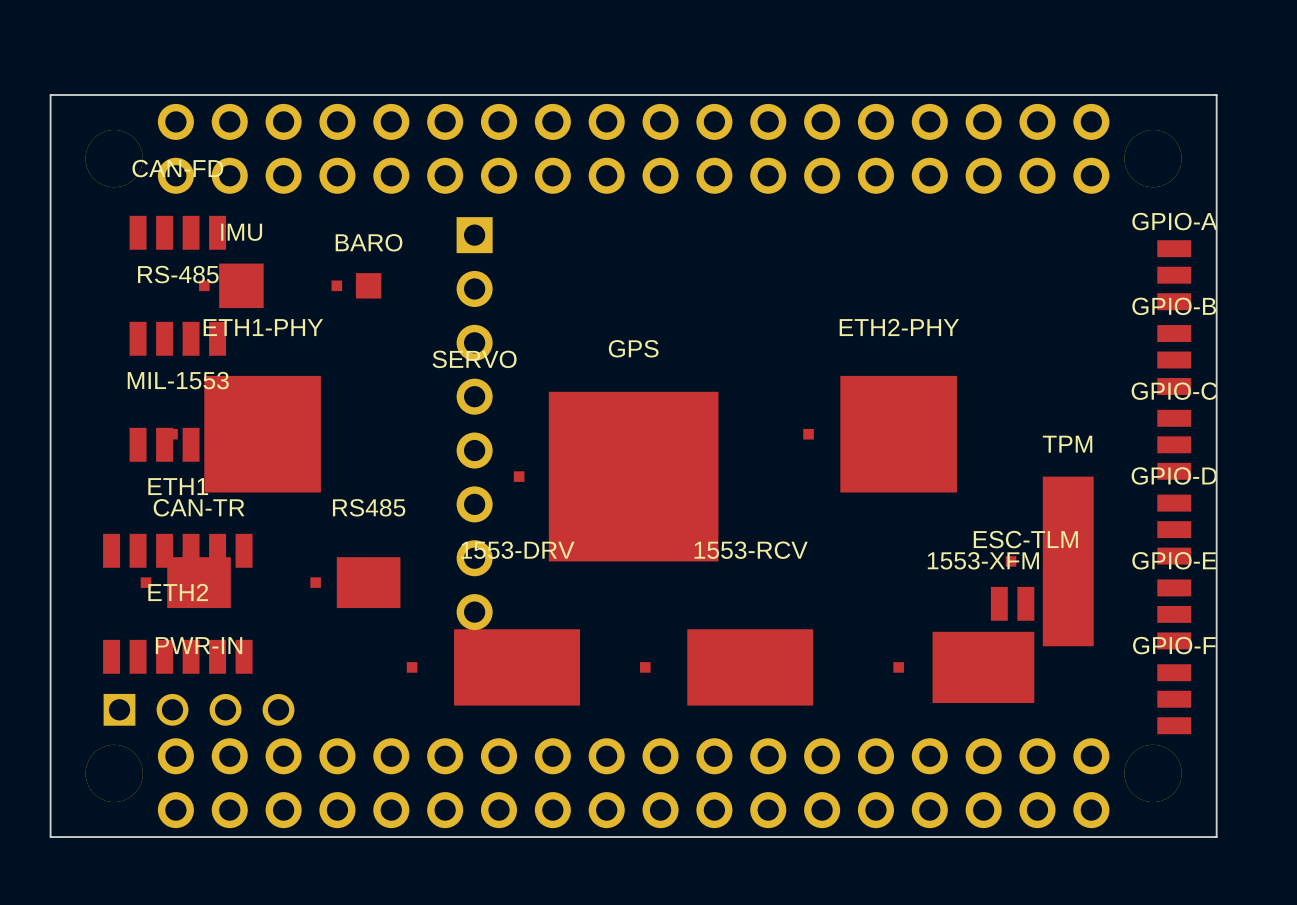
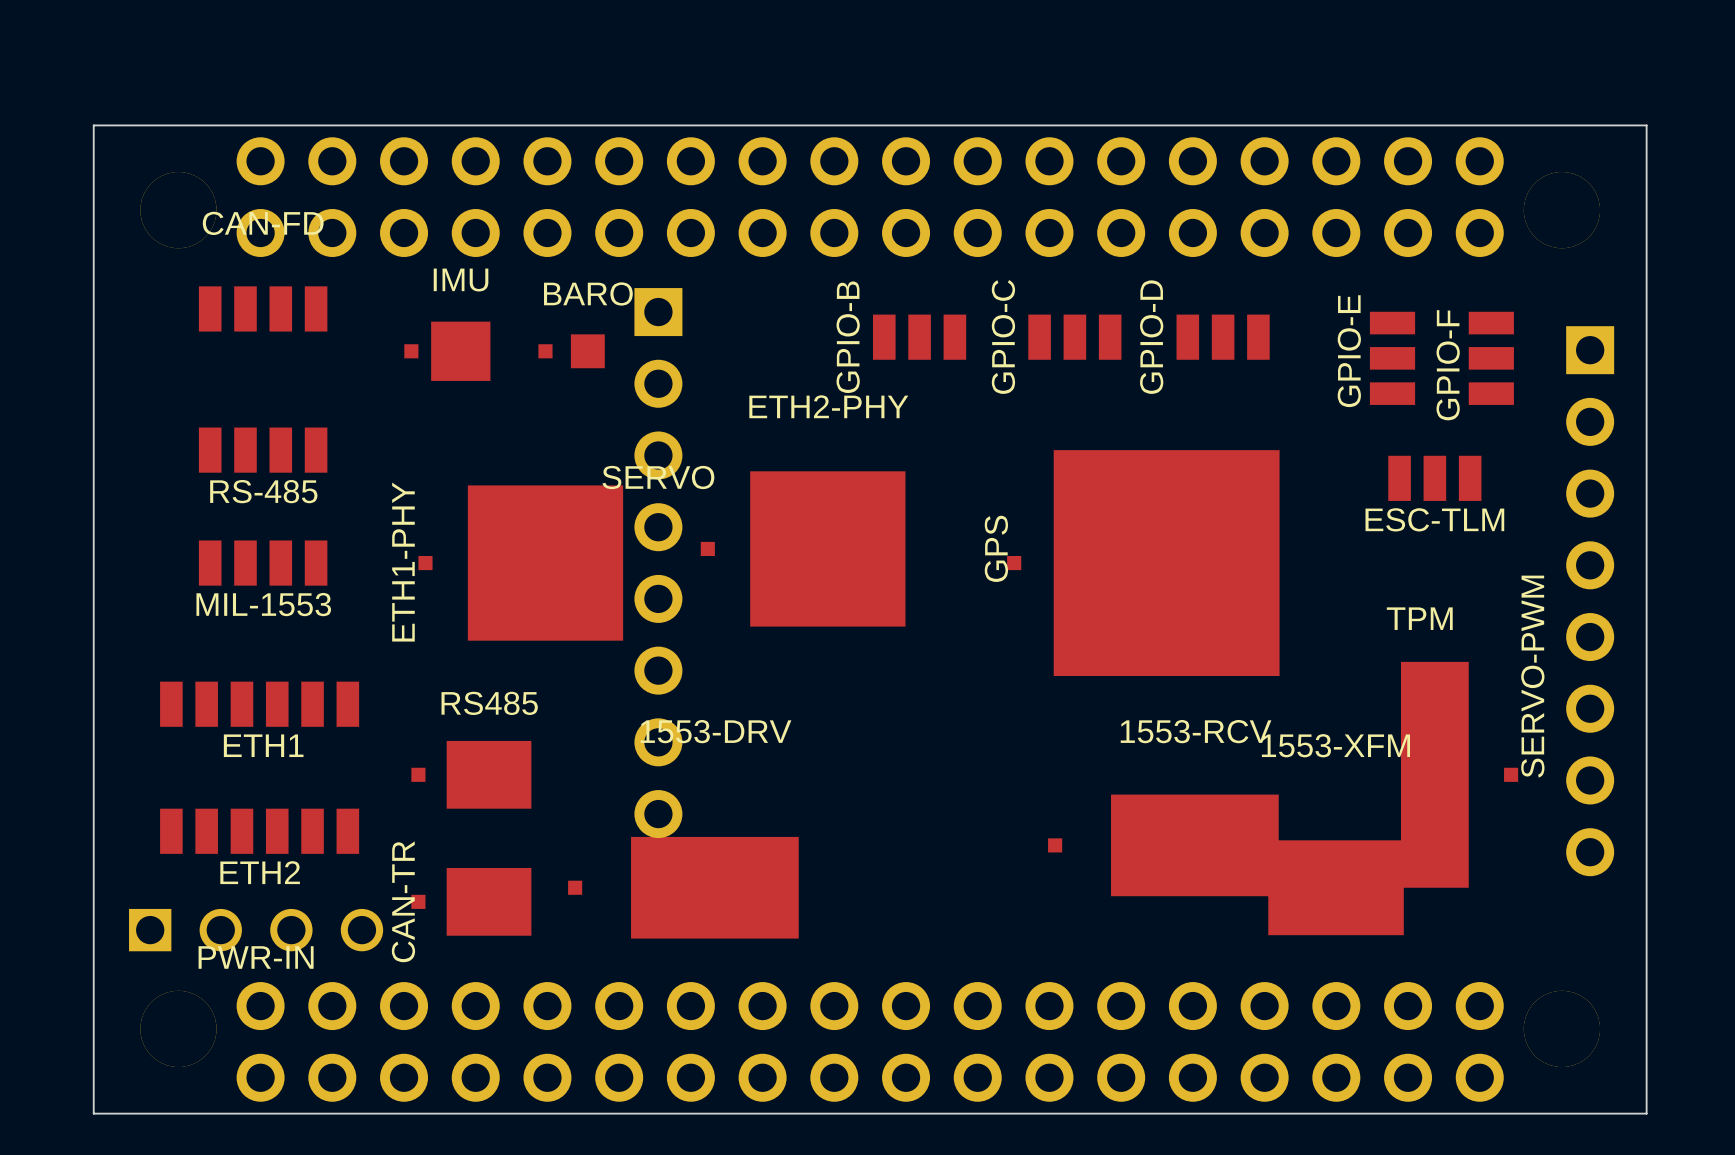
RS-485 name position: RS-485 (178, 274) -> RS-485 (263, 491)
GPIO-A: (1174, 275) -> none
IMU position: (231, 285) -> (447, 351)
BARO position: (356, 285) -> (571, 351)
GPIO-B name position: GPIO-B (1174, 306) -> GPIO-B (848, 337)
ETH1-PHY name rotation: 0° (263, 327) -> 90° counterclockwise (403, 562)
GPS name rotation: 0° (633, 348) -> 90° counterclockwise (996, 548)
GPS name position: GPS (633, 348) -> GPS (996, 548)
GPIO-B rotation: 0° (1174, 360) -> 90° clockwise (919, 337)
GPIO-B position: (1174, 360) -> (919, 337)
MIL-1553 name position: MIL-1553 (178, 380) -> MIL-1553 (263, 604)
GPIO-C name position: GPIO-C (1174, 391) -> GPIO-C (1003, 336)
ETH1-PHY position: (244, 434) -> (520, 563)
ETH2-PHY position: (880, 434) -> (803, 548)
MIL-1553 position: (177, 444) -> (263, 563)
TPM name position: TPM (1067, 444) -> TPM (1419, 618)
GPIO-C rotation: 0° (1174, 444) -> 90° clockwise (1074, 337)
GPIO-C position: (1174, 444) -> (1074, 337)
SERVO-PWM: none -> (1590, 601)
GPIO-D name position: GPIO-D (1174, 475) -> GPIO-D (1151, 337)
GPS position: (616, 476) -> (1143, 563)
ETH1 name position: ETH1 (178, 486) -> ETH1 (263, 745)
CAN-TR name rotation: 0° (199, 507) -> 90° counterclockwise (403, 901)
RS485 name position: RS485 (369, 507) -> RS485 (489, 703)
GPIO-D rotation: 0° (1174, 529) -> 90° clockwise (1223, 337)
GPIO-D position: (1174, 529) -> (1223, 337)
ESC-TLM name position: ESC-TLM (1025, 539) -> ESC-TLM (1434, 519)
ETH1 position: (177, 550) -> (259, 704)
1553-RCV name position: 1553-RCV (751, 550) -> 1553-RCV (1196, 731)
GPIO-E name rotation: 0° (1174, 560) -> 90° counterclockwise (1349, 351)
TPM rotation: 0° (1049, 561) -> 180° (1459, 774)
CAN-TR position: (185, 582) -> (471, 901)
RS485 position: (355, 582) -> (471, 774)
ETH2 name position: ETH2 (178, 592) -> ETH2 (260, 872)
ESC-TLM position: (1025, 603) -> (1434, 478)
GPIO-E position: (1174, 614) -> (1392, 358)
PWR-IN name position: PWR-IN (199, 645) -> PWR-IN (256, 957)
GPIO-F name rotation: 0° (1174, 645) -> 90° counterclockwise (1448, 365)
ETH2 position: (177, 656) -> (259, 831)
1553-RCV position: (726, 667) -> (1163, 845)
GPIO-F position: (1174, 699) -> (1491, 358)
PWR-IN position: (199, 709) -> (256, 930)

